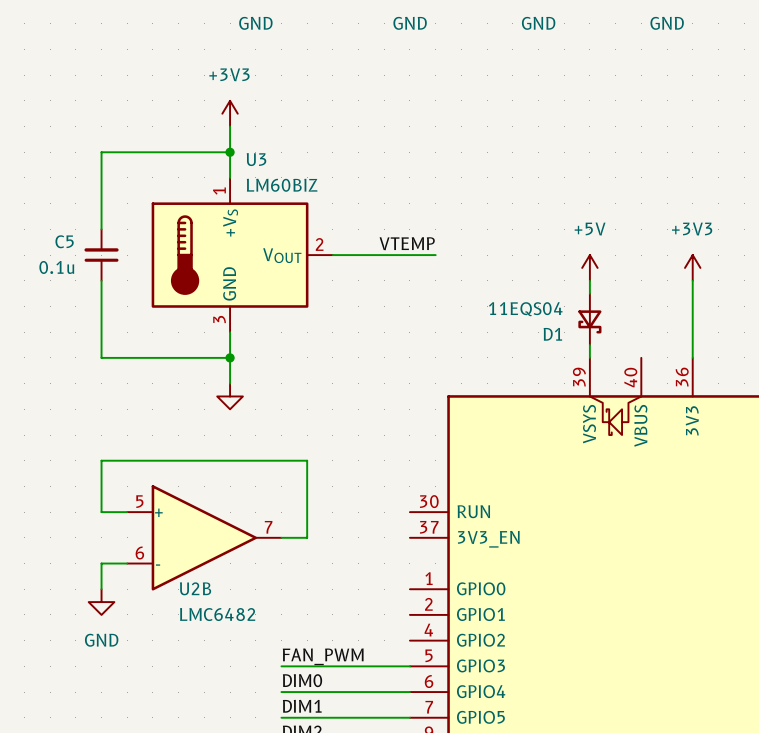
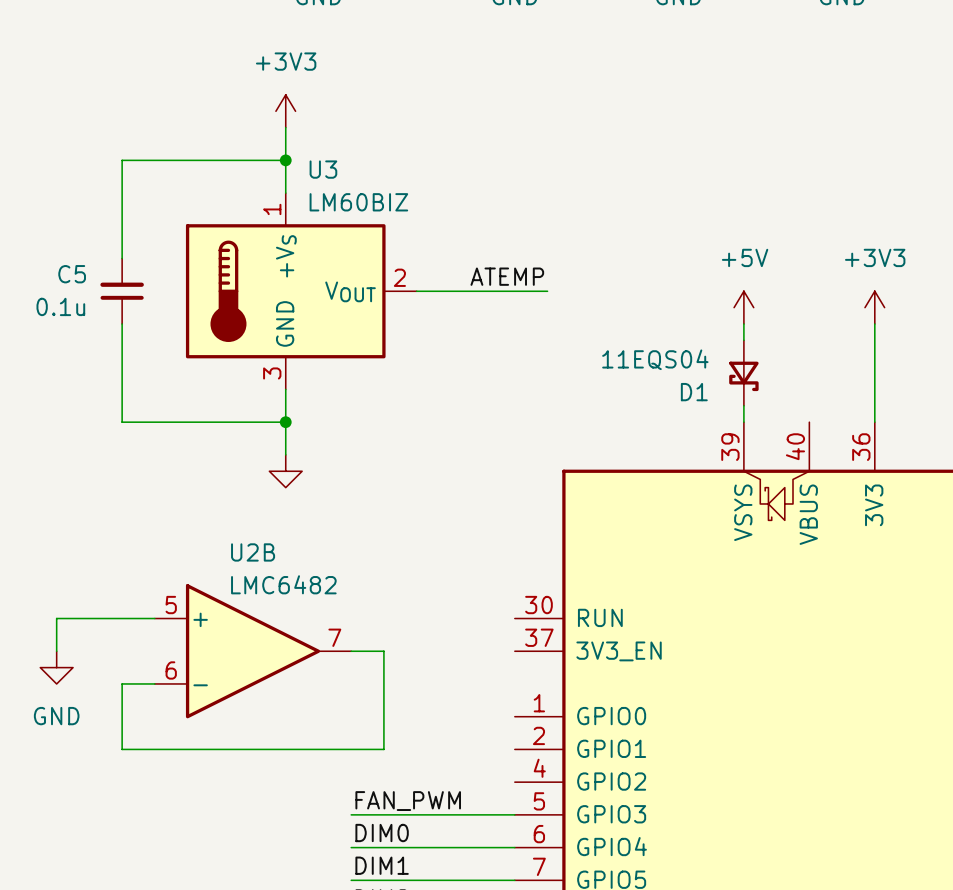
label: VTEMP (407, 243) -> ATEMP (507, 276)
wire: (101, 512) (101, 460) (307, 460) (307, 537) -> (122, 716) (122, 749) (383, 749) (383, 651)
wire: none -> (122, 618) (56, 618) (56, 651)
U2B name position: U2B (195, 588) -> U2B (253, 552)
power symbol position: GND (101, 602) -> GND (56, 667)
U2B value position: LMC6482 (217, 614) -> LMC6482 (283, 584)

